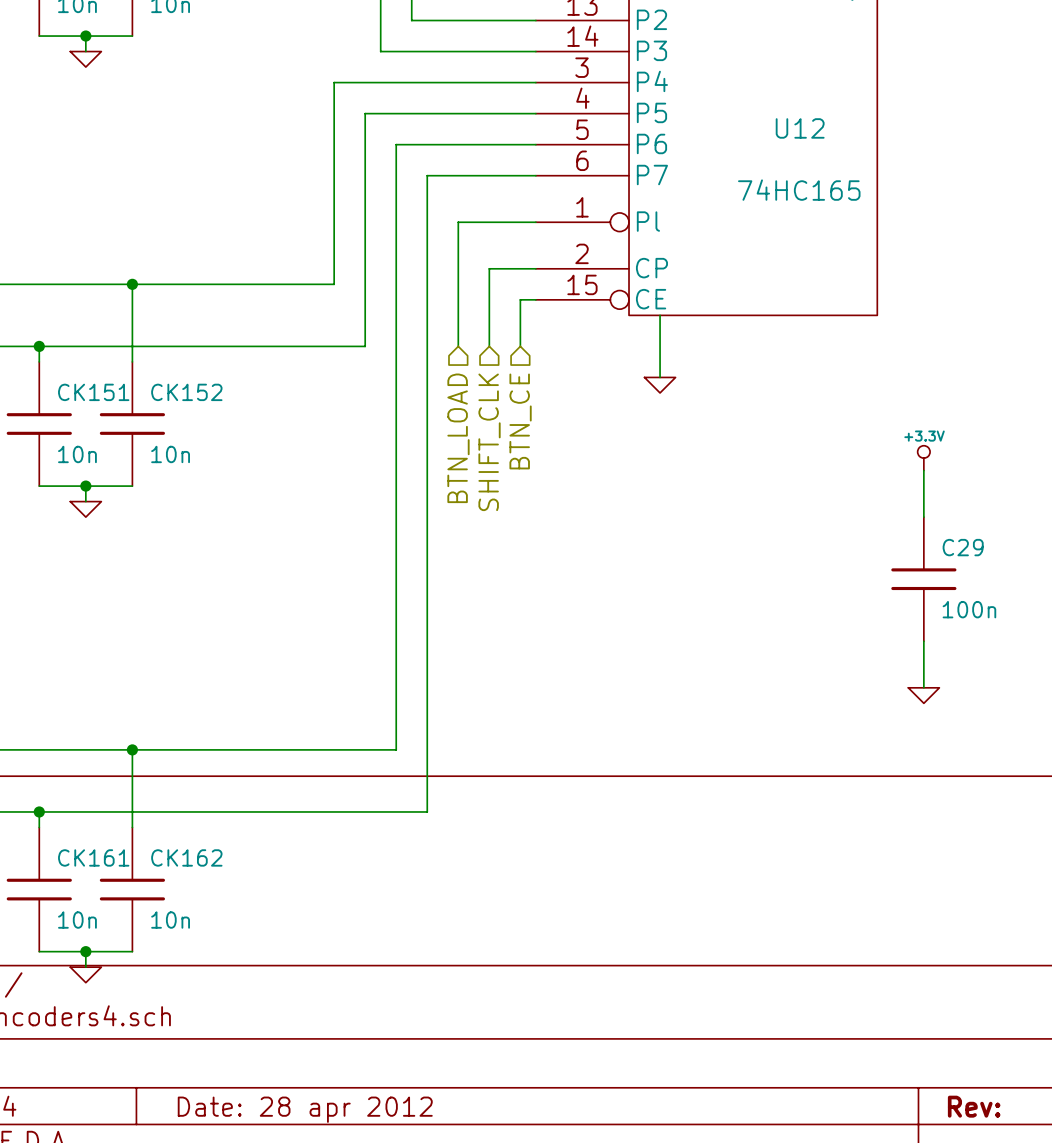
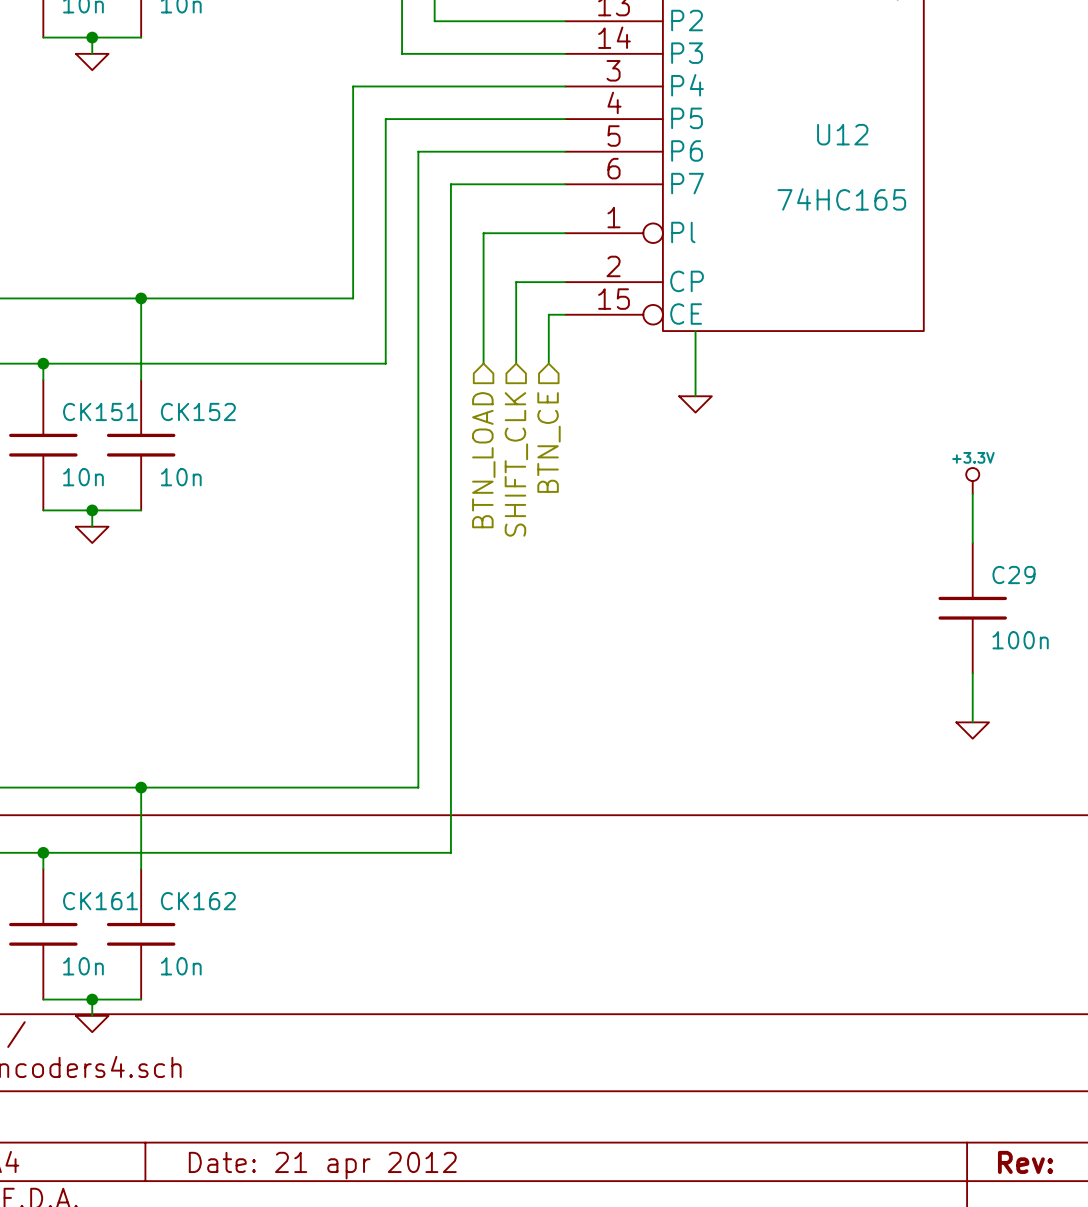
title block: Date: 28 apr 2012 (305, 1109) -> Date: 21 apr 2012 (322, 1165)

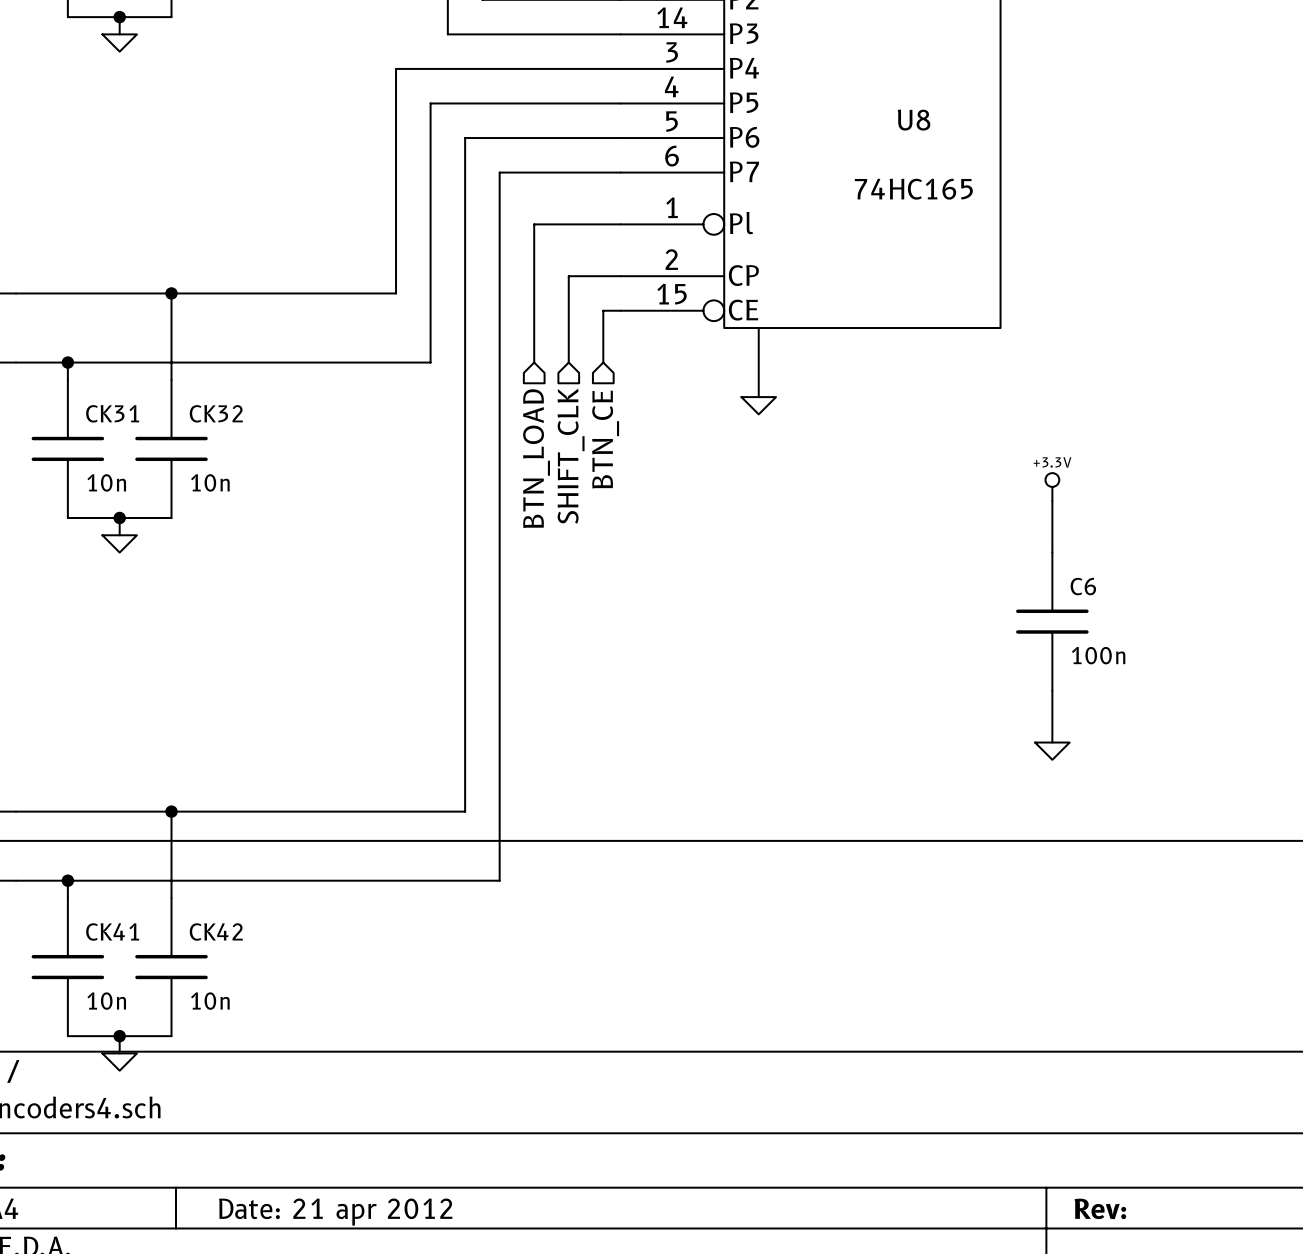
U12 name: U12 (842, 134) -> U8 (914, 120)
CK151 name: CK151 (100, 411) -> CK31 (112, 413)
CK152 name: CK152 (198, 411) -> CK32 (216, 413)
C29 name: C29 (1013, 575) -> C6 (1083, 586)
CK161 name: CK161 (100, 901) -> CK41 (112, 931)
CK162 name: CK162 (198, 901) -> CK42 (216, 931)

